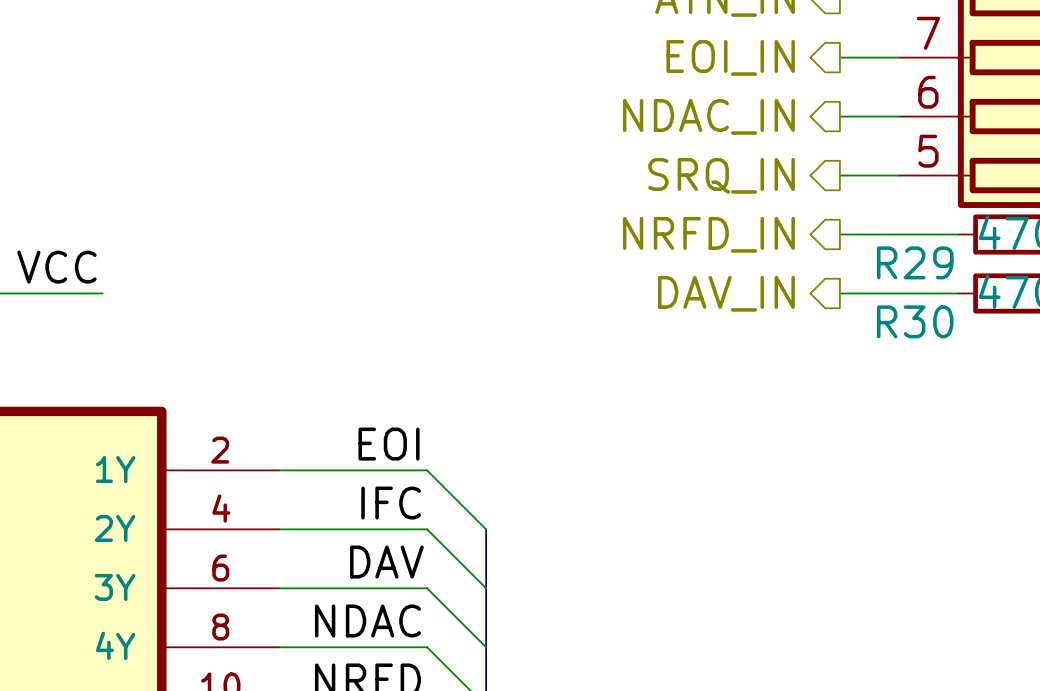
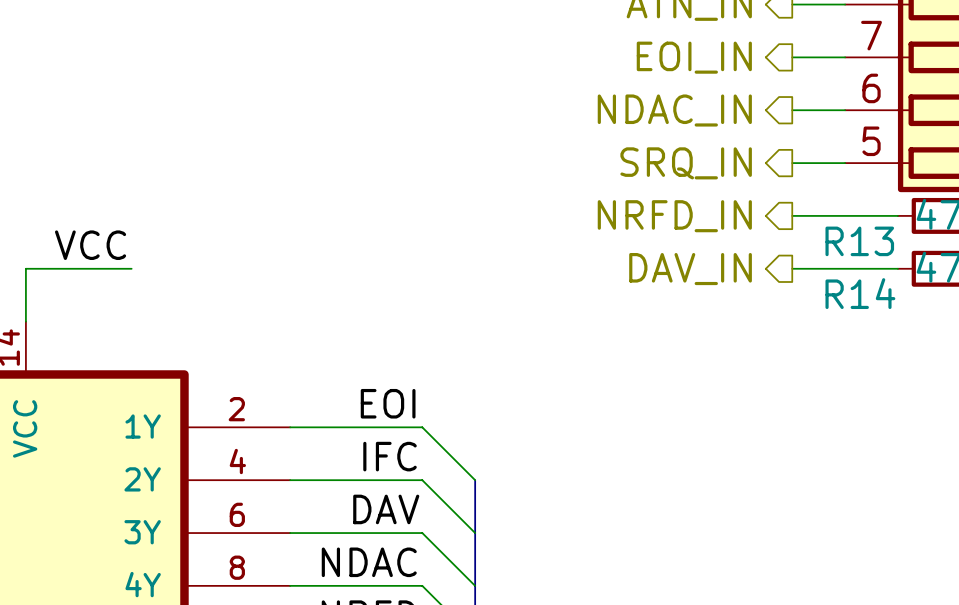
R29 name: R29 (915, 262) -> R13 (859, 241)
R30 name: R30 (915, 321) -> R14 (860, 293)

